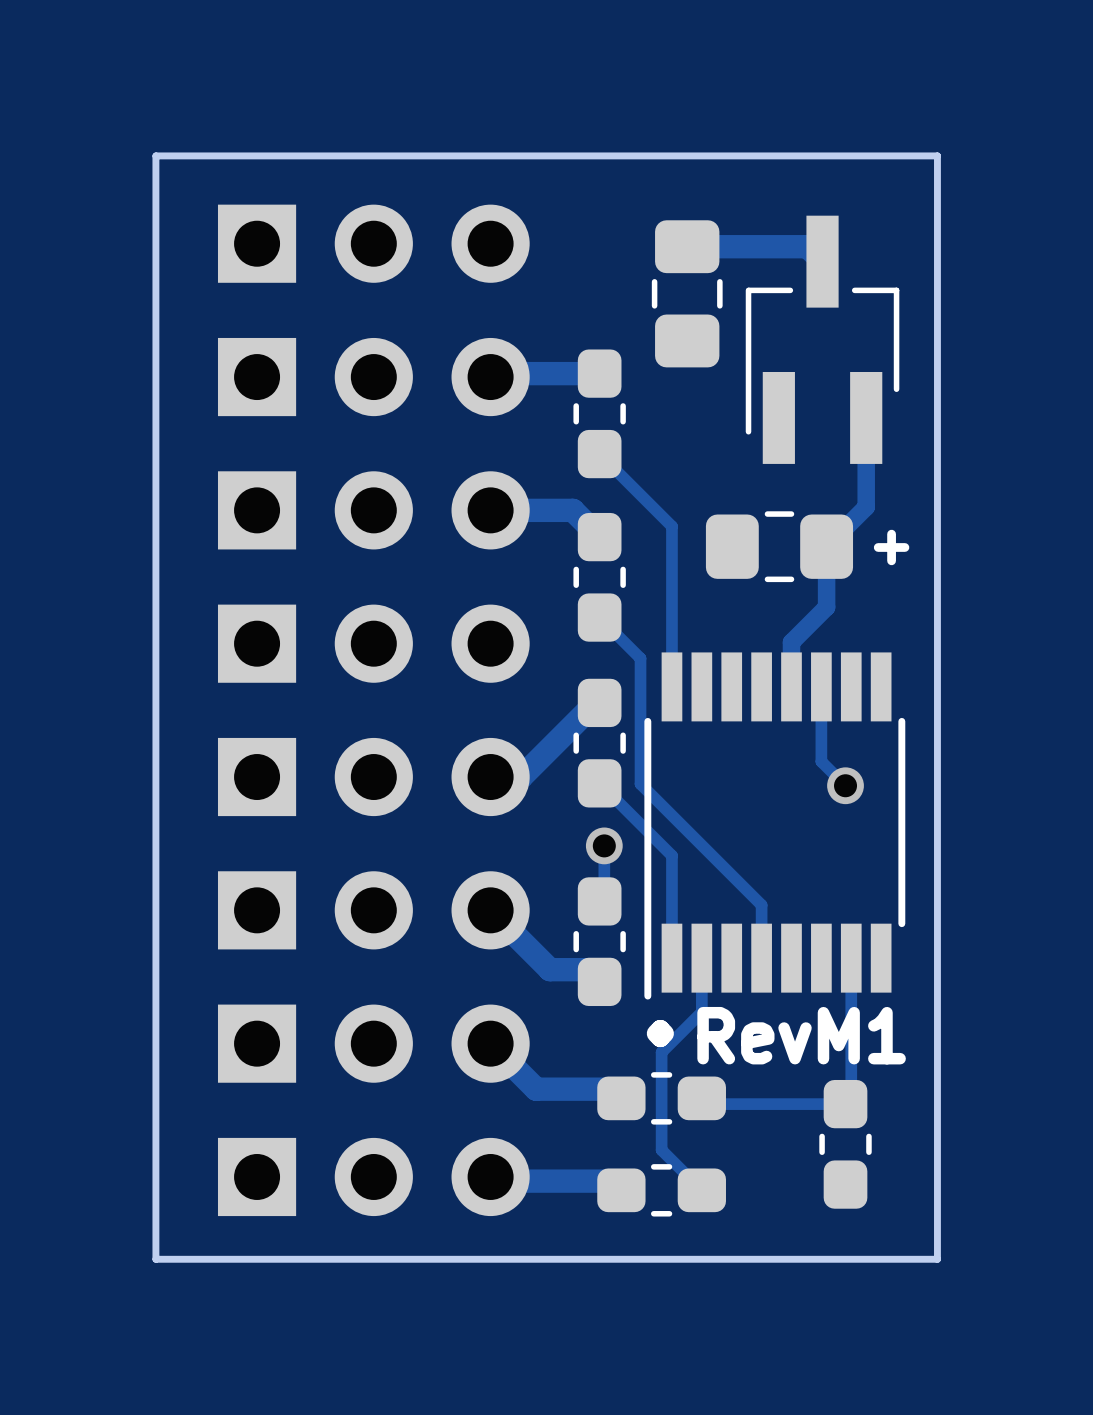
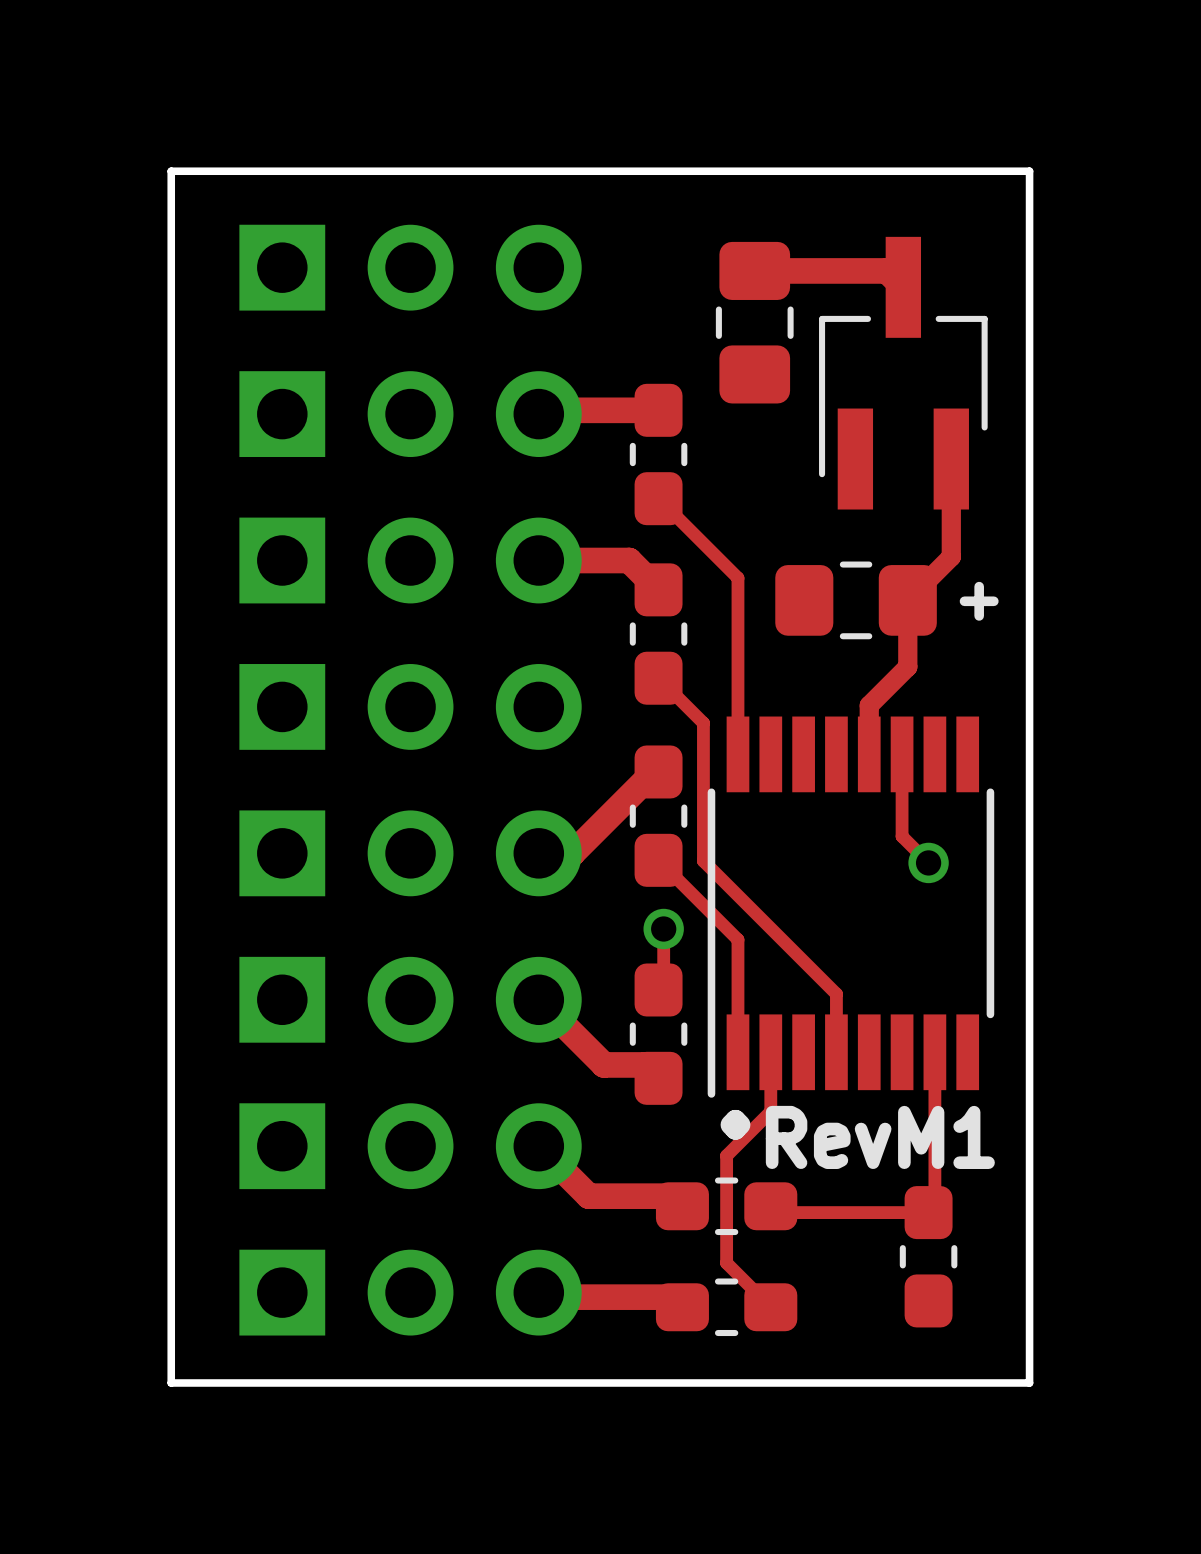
text position: . (660, 1033) -> . (735, 1124)

